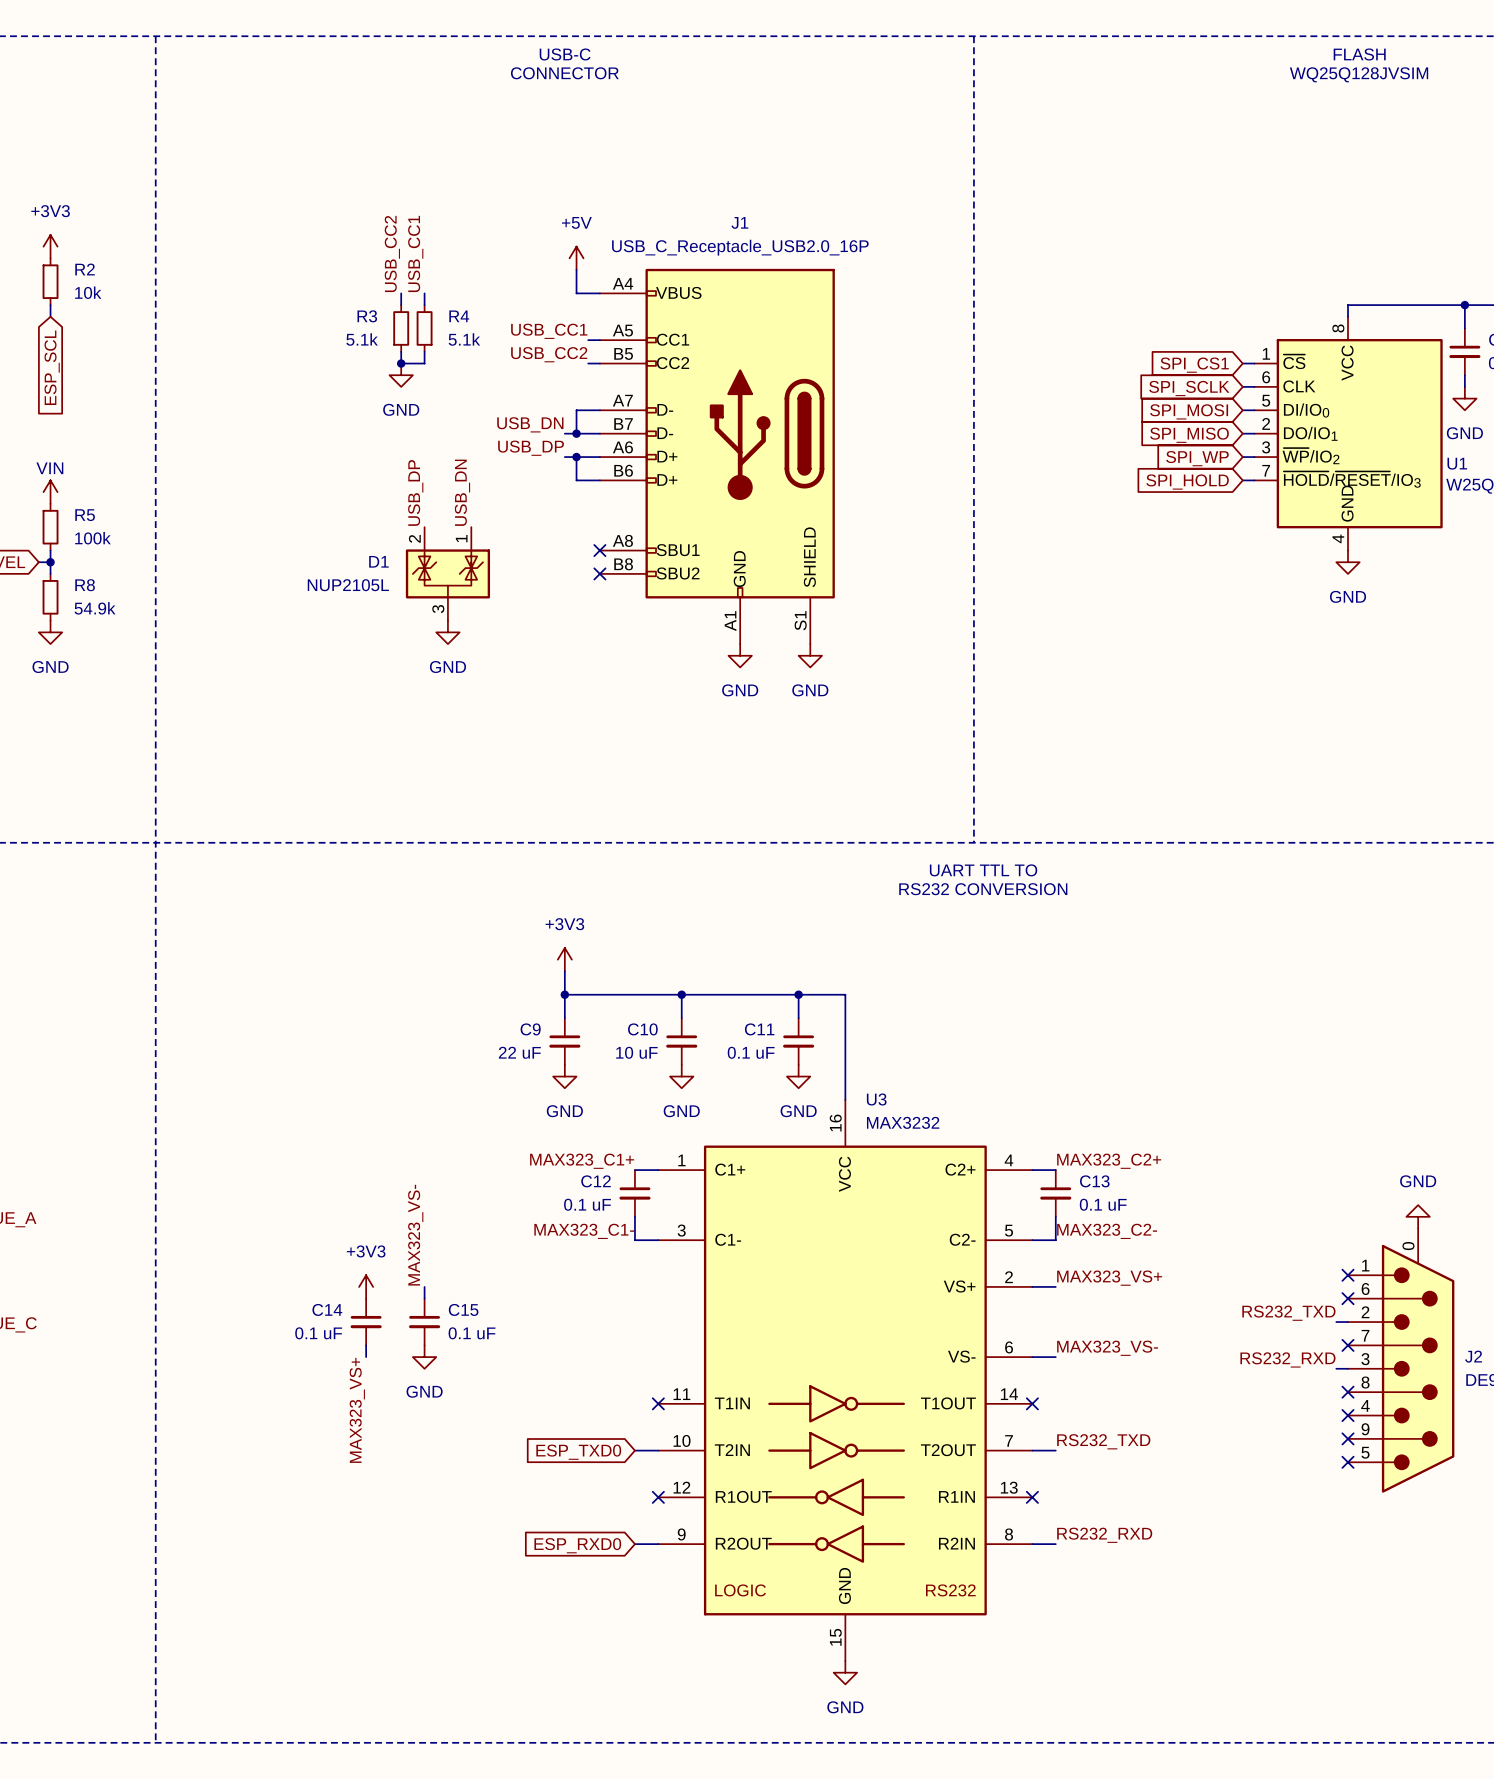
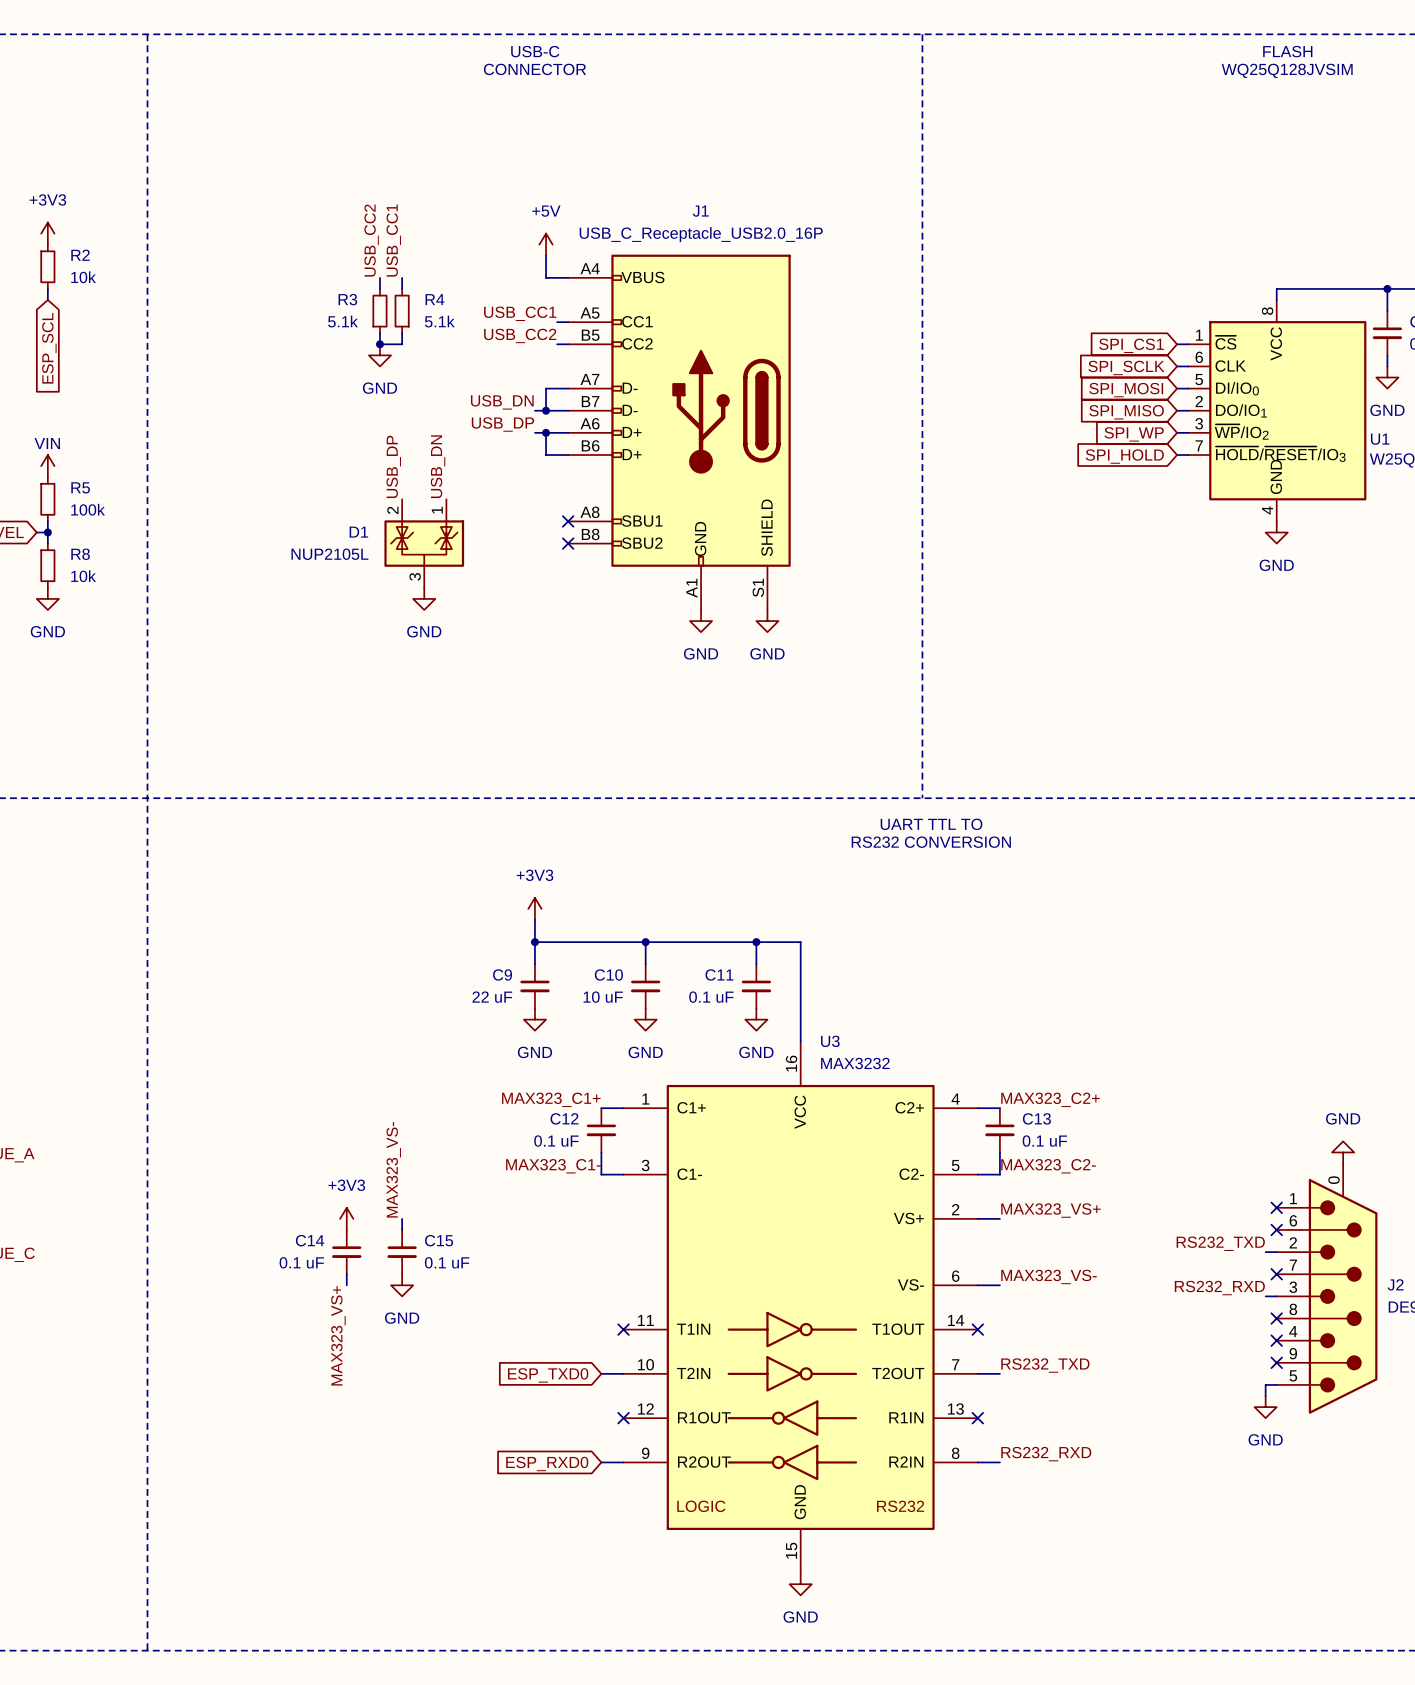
R8 value: 54.9k (95, 608) -> 10k (83, 576)
wire: none -> (1276, 1384) (1265, 1384) (1265, 1396)
no-connect mark: (1347, 1462) -> none
power symbol: none -> GND (1265, 1407)

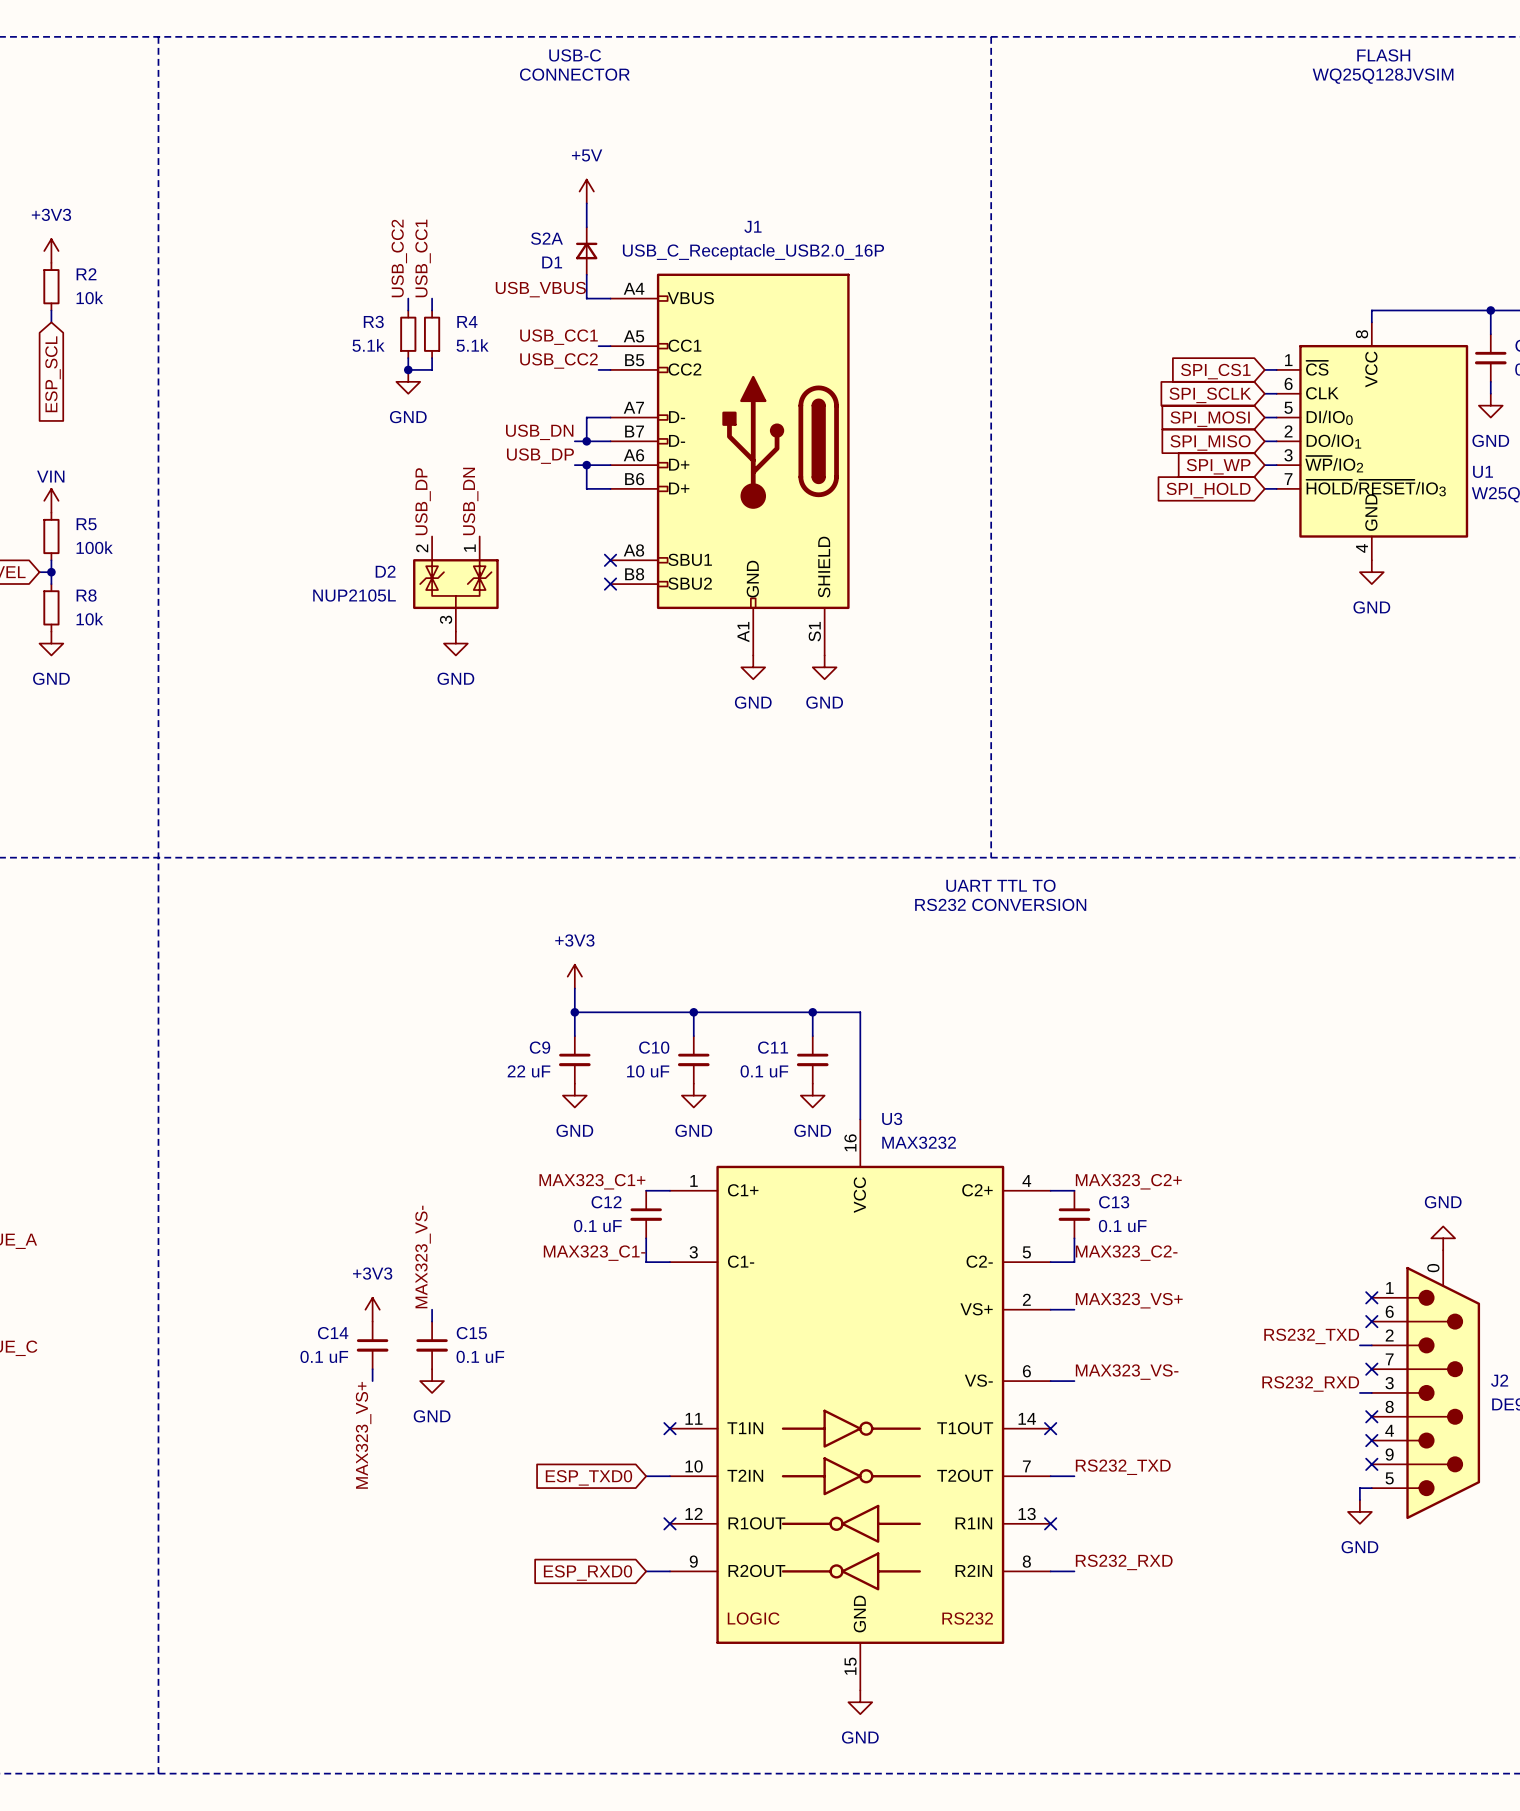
wire: none -> (586, 203) (586, 227)
D1: none -> S2A (586, 251)
power symbol position: +5V (546, 244) -> +5V (586, 191)
label: none -> USB_VBUS (540, 289)
D1 name: D1 (358, 532) -> D2 (385, 571)

